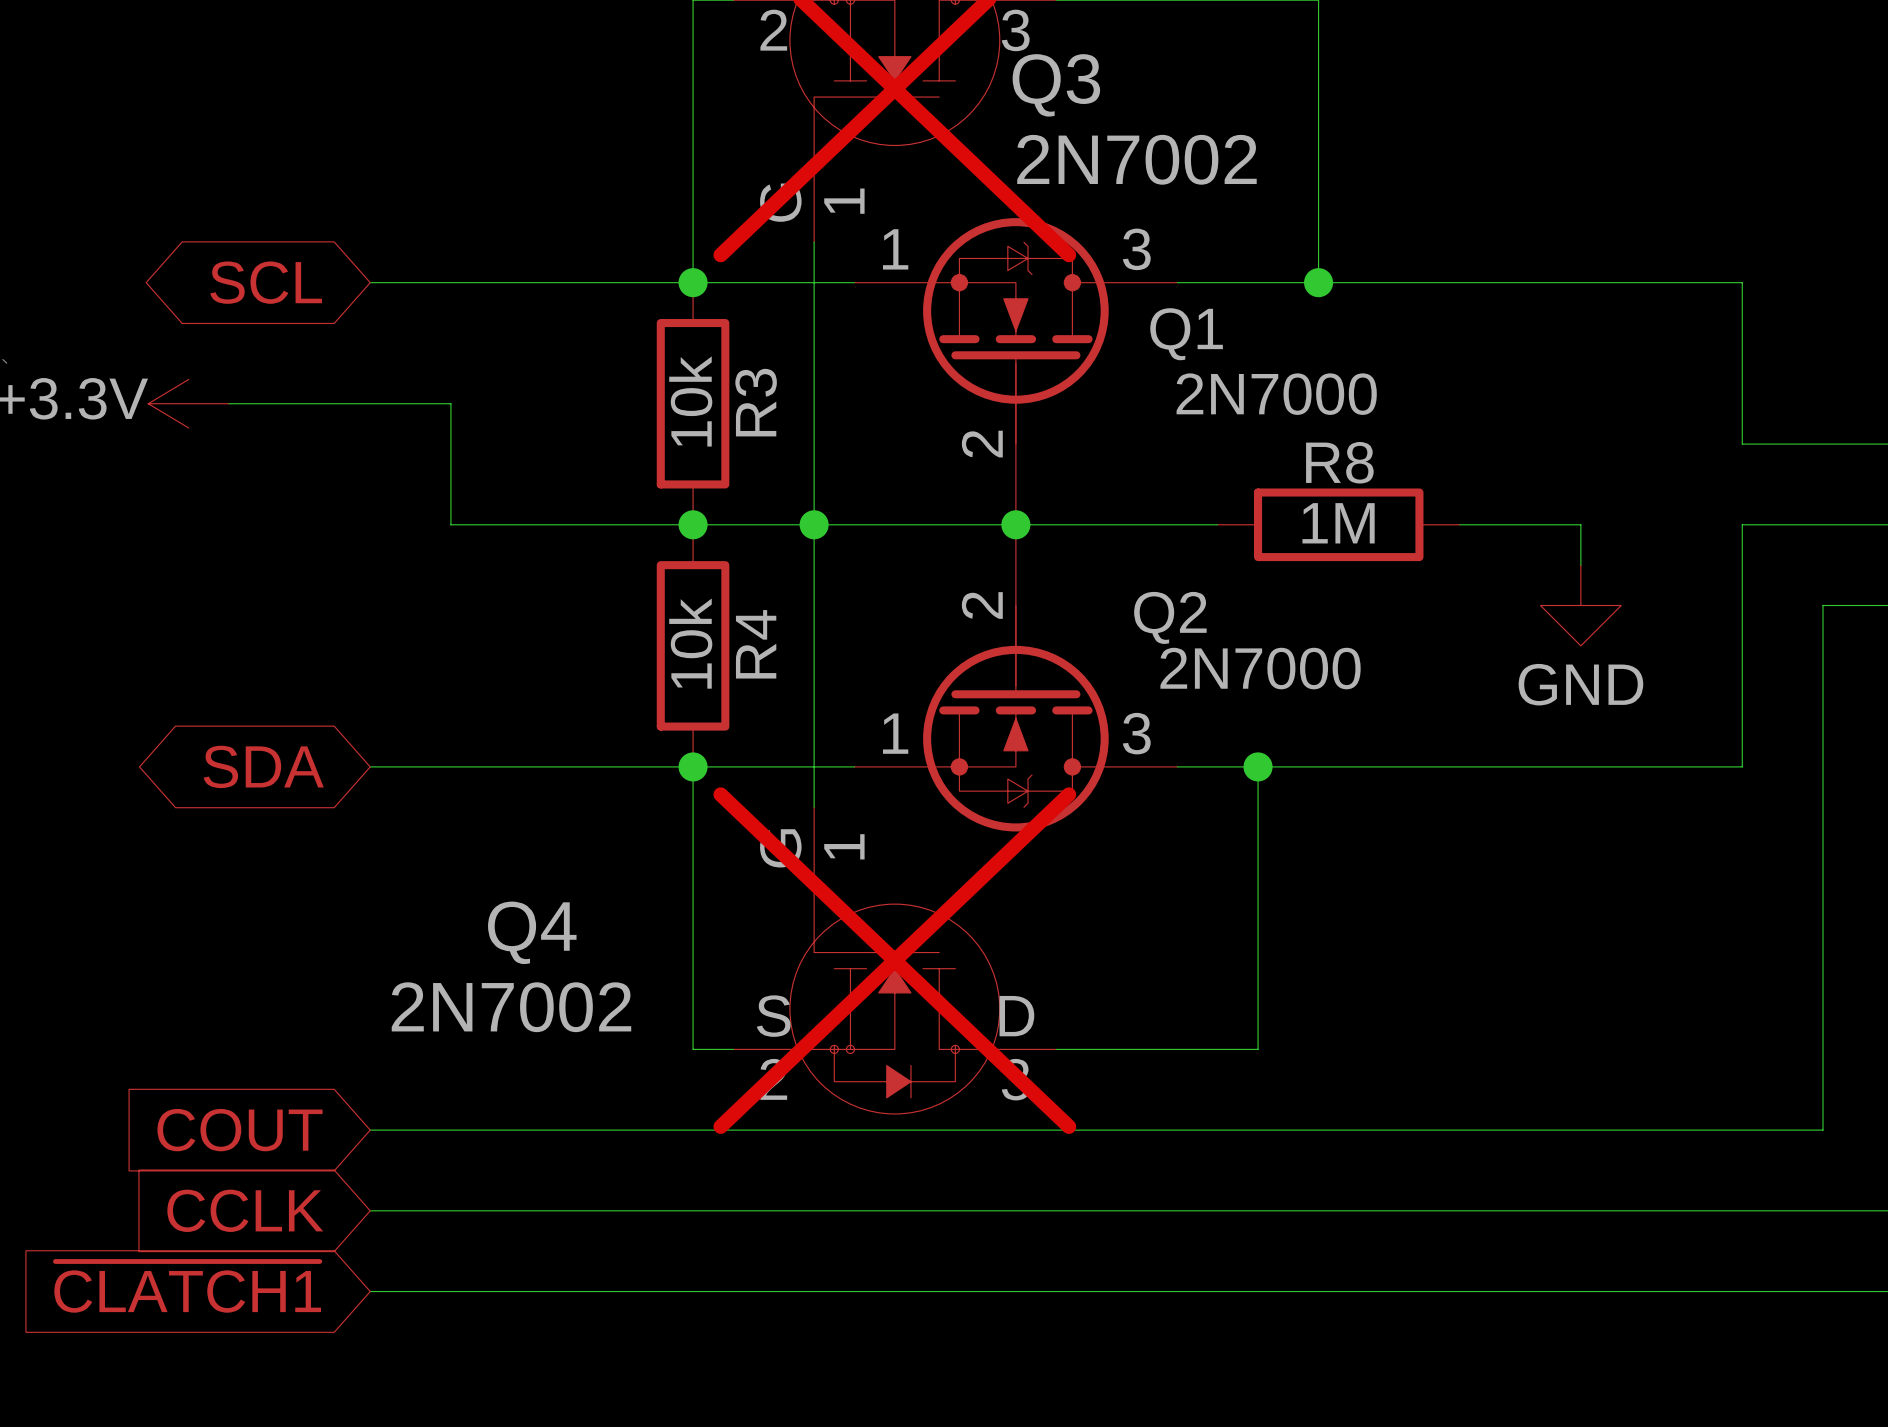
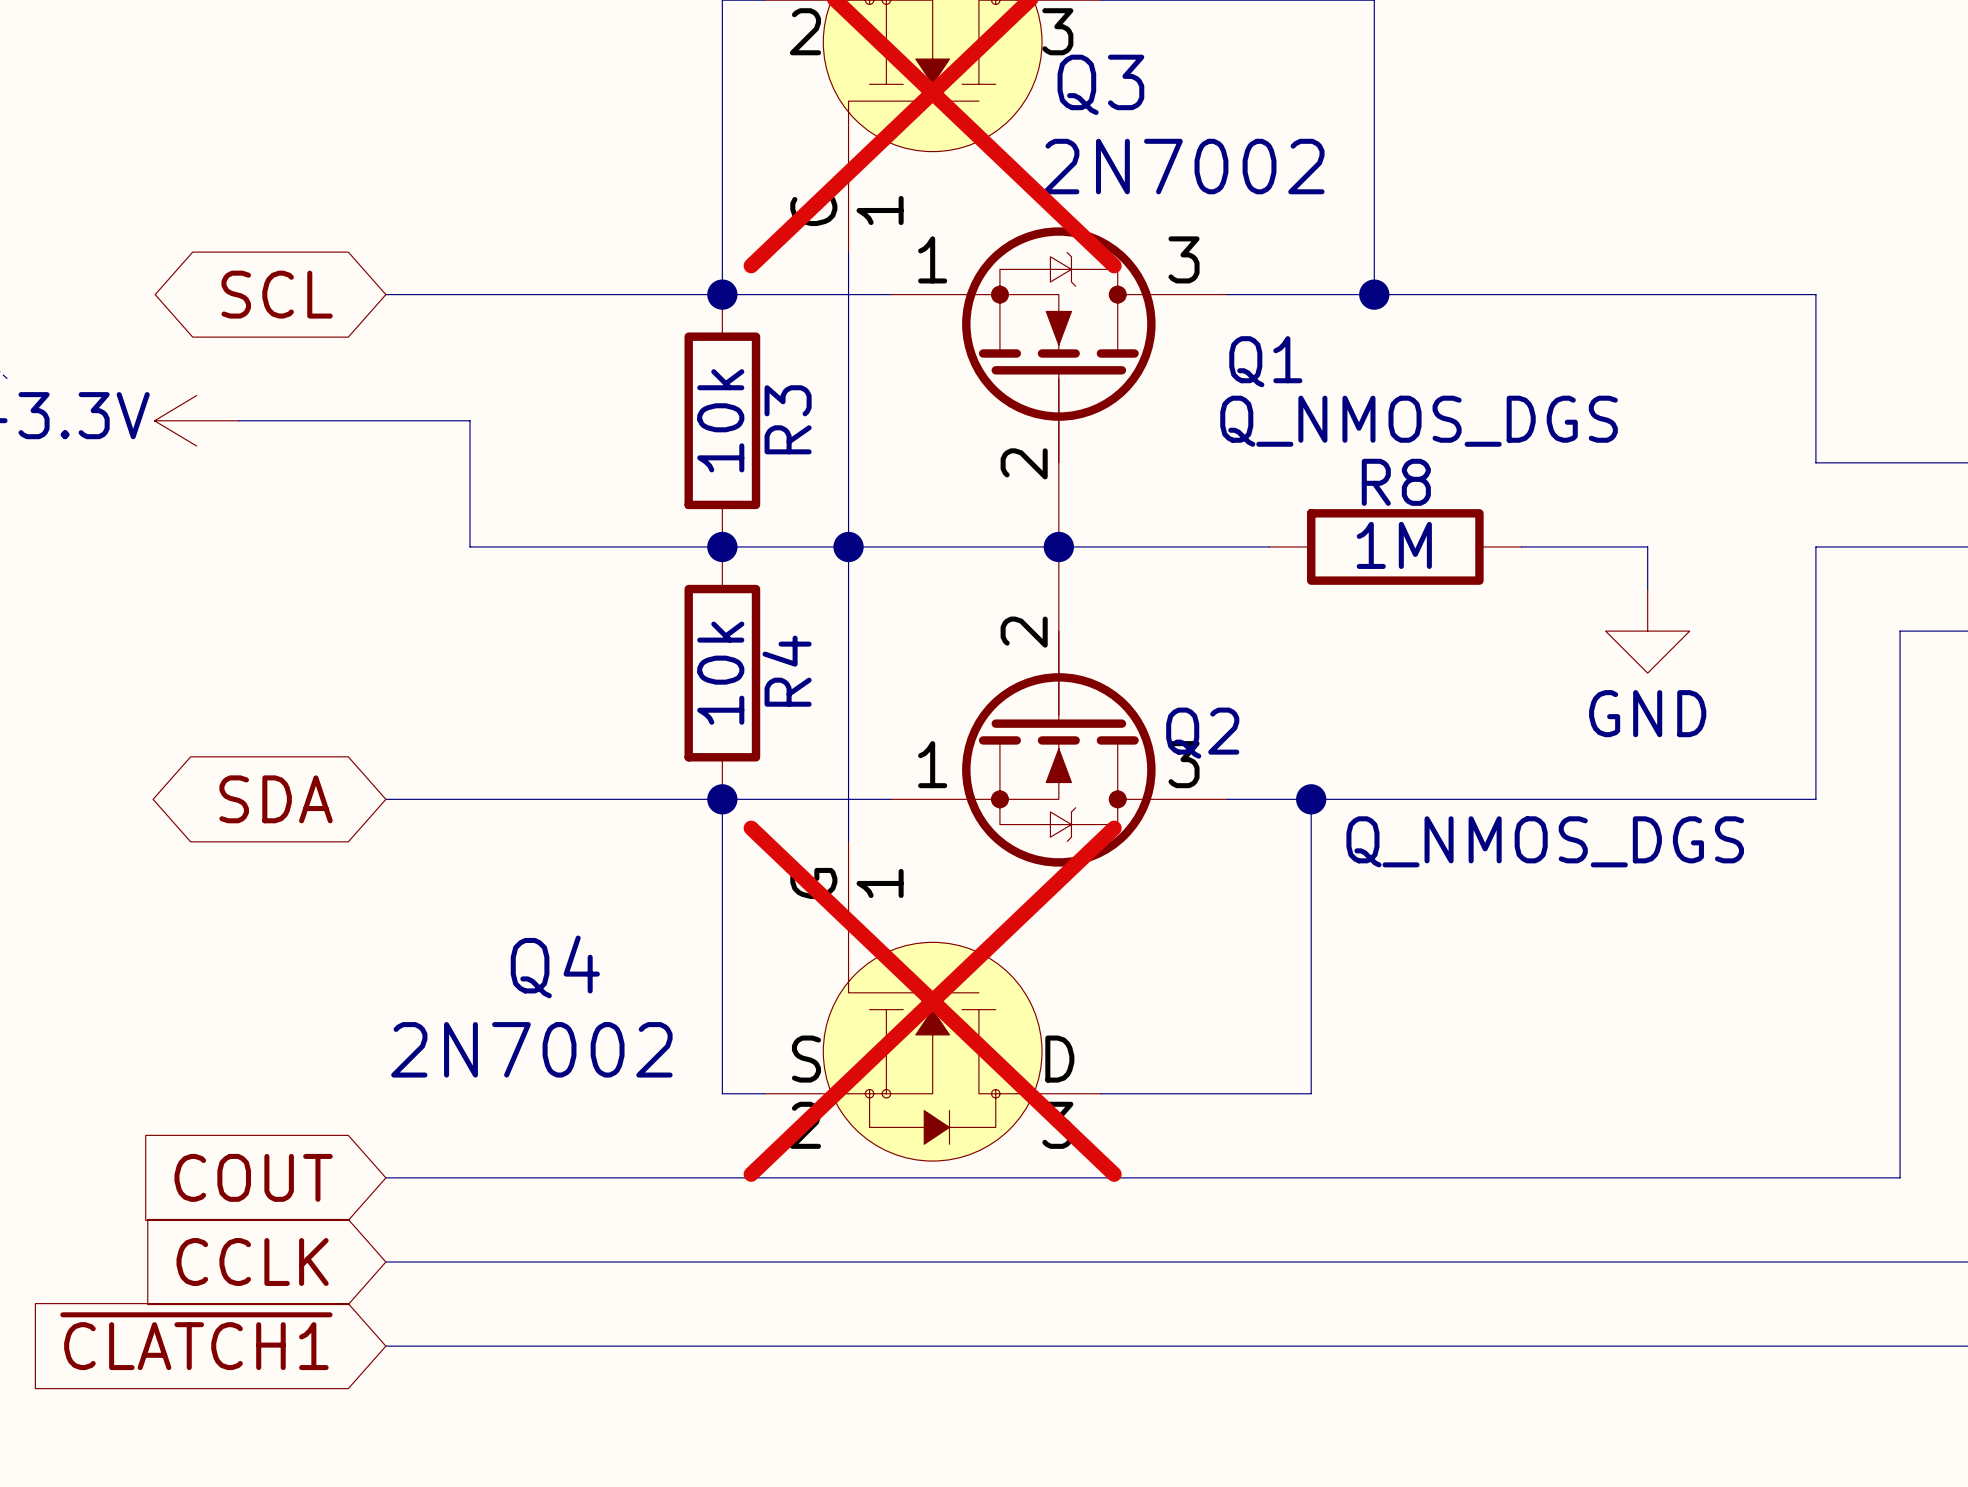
Q1 name position: Q1 (1186, 334) -> Q1 (1265, 361)
Q1 value: 2N7000 (1276, 394) -> Q_NMOS_DGS (1419, 421)
Q2 name position: Q2 (1170, 617) -> Q2 (1202, 733)
Q2 value: 2N7000 (1260, 668) -> Q_NMOS_DGS (1545, 841)

